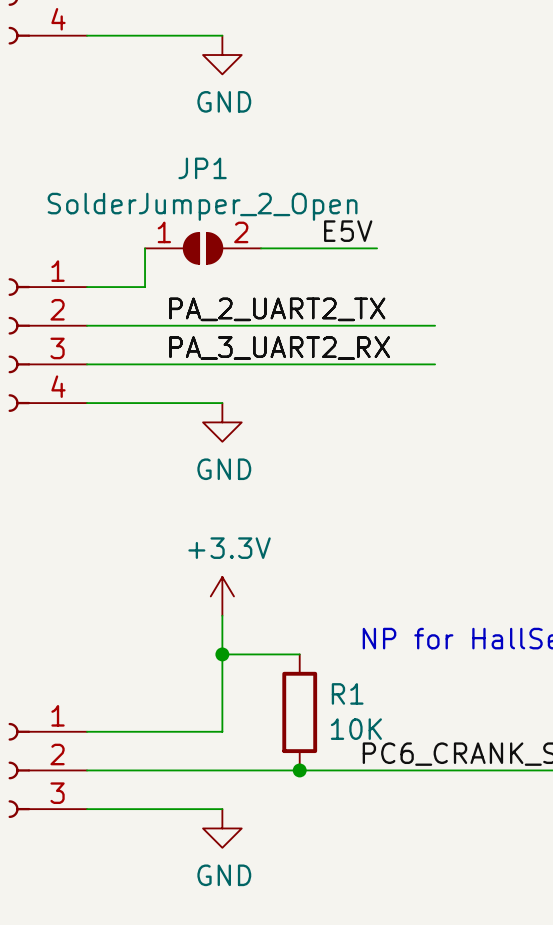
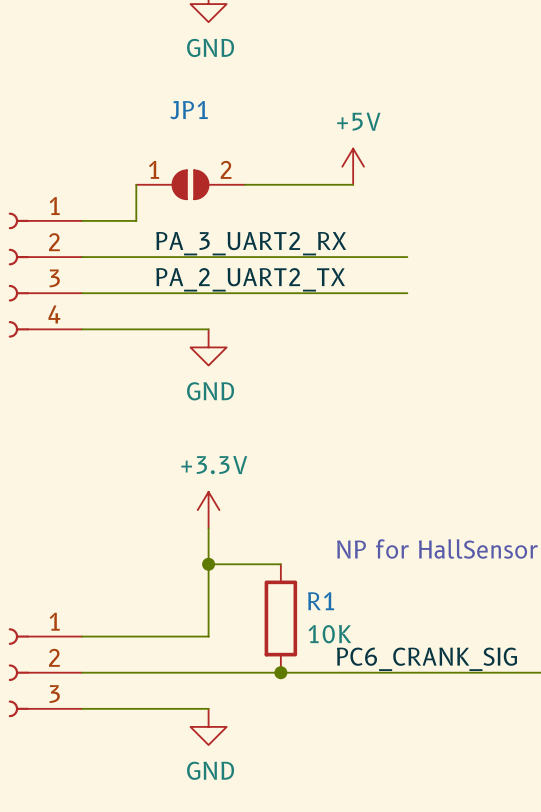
JP1 value: SolderJumper_2_Open (202, 206) -> none
power symbol: none -> +5V (353, 166)
label: E5V (348, 231) -> none
label: PA_2_UART2_TX (277, 309) -> PA_3_UART2_RX (251, 243)
label: PA_3_UART2_RX (279, 348) -> PA_2_UART2_TX (250, 279)

